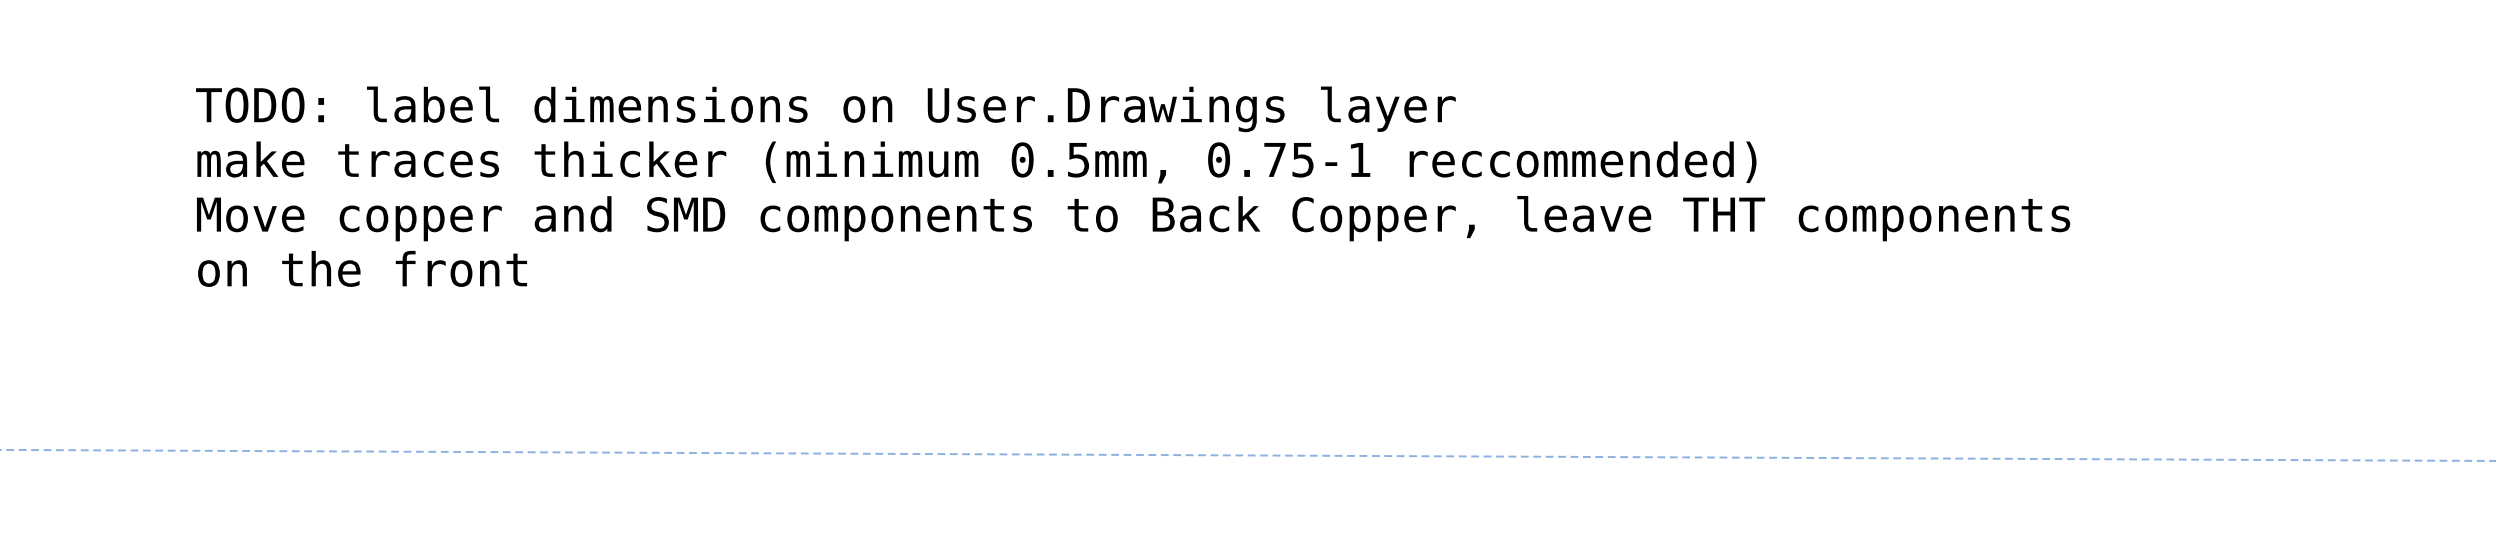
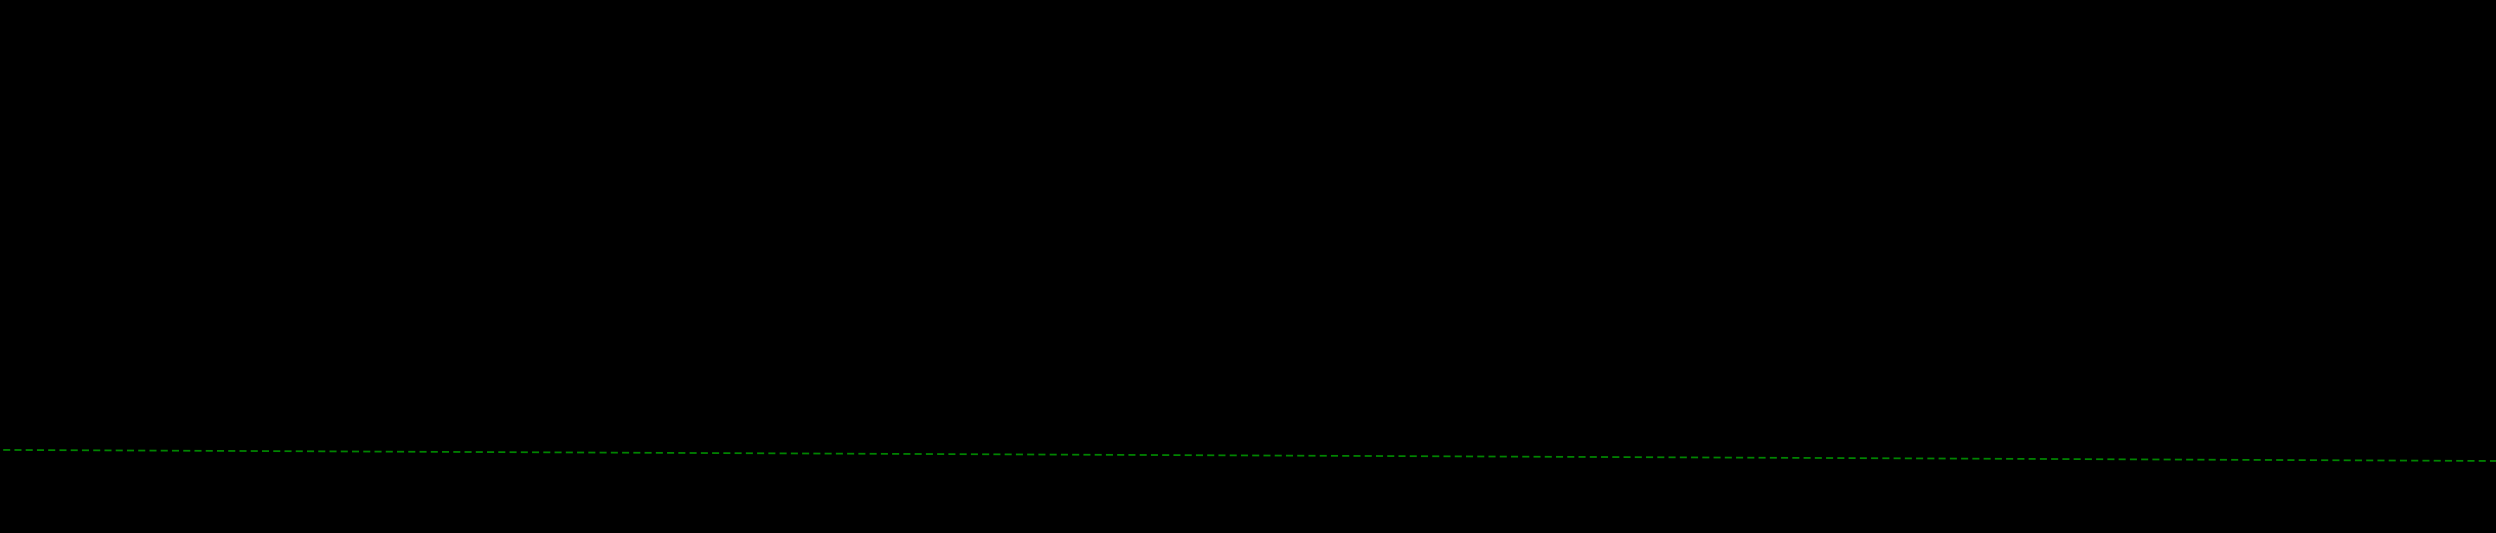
text: TODO: label dimensions on User.Drawings layer (825, 109) -> none
text: make traces thicker (minimum 0.5mm, 0.75-1 reccommended) (976, 162) -> none
text: Move copper and SMD components to Back Copper, leave THT components (1133, 218) -> none
text: on the front (362, 268) -> none

